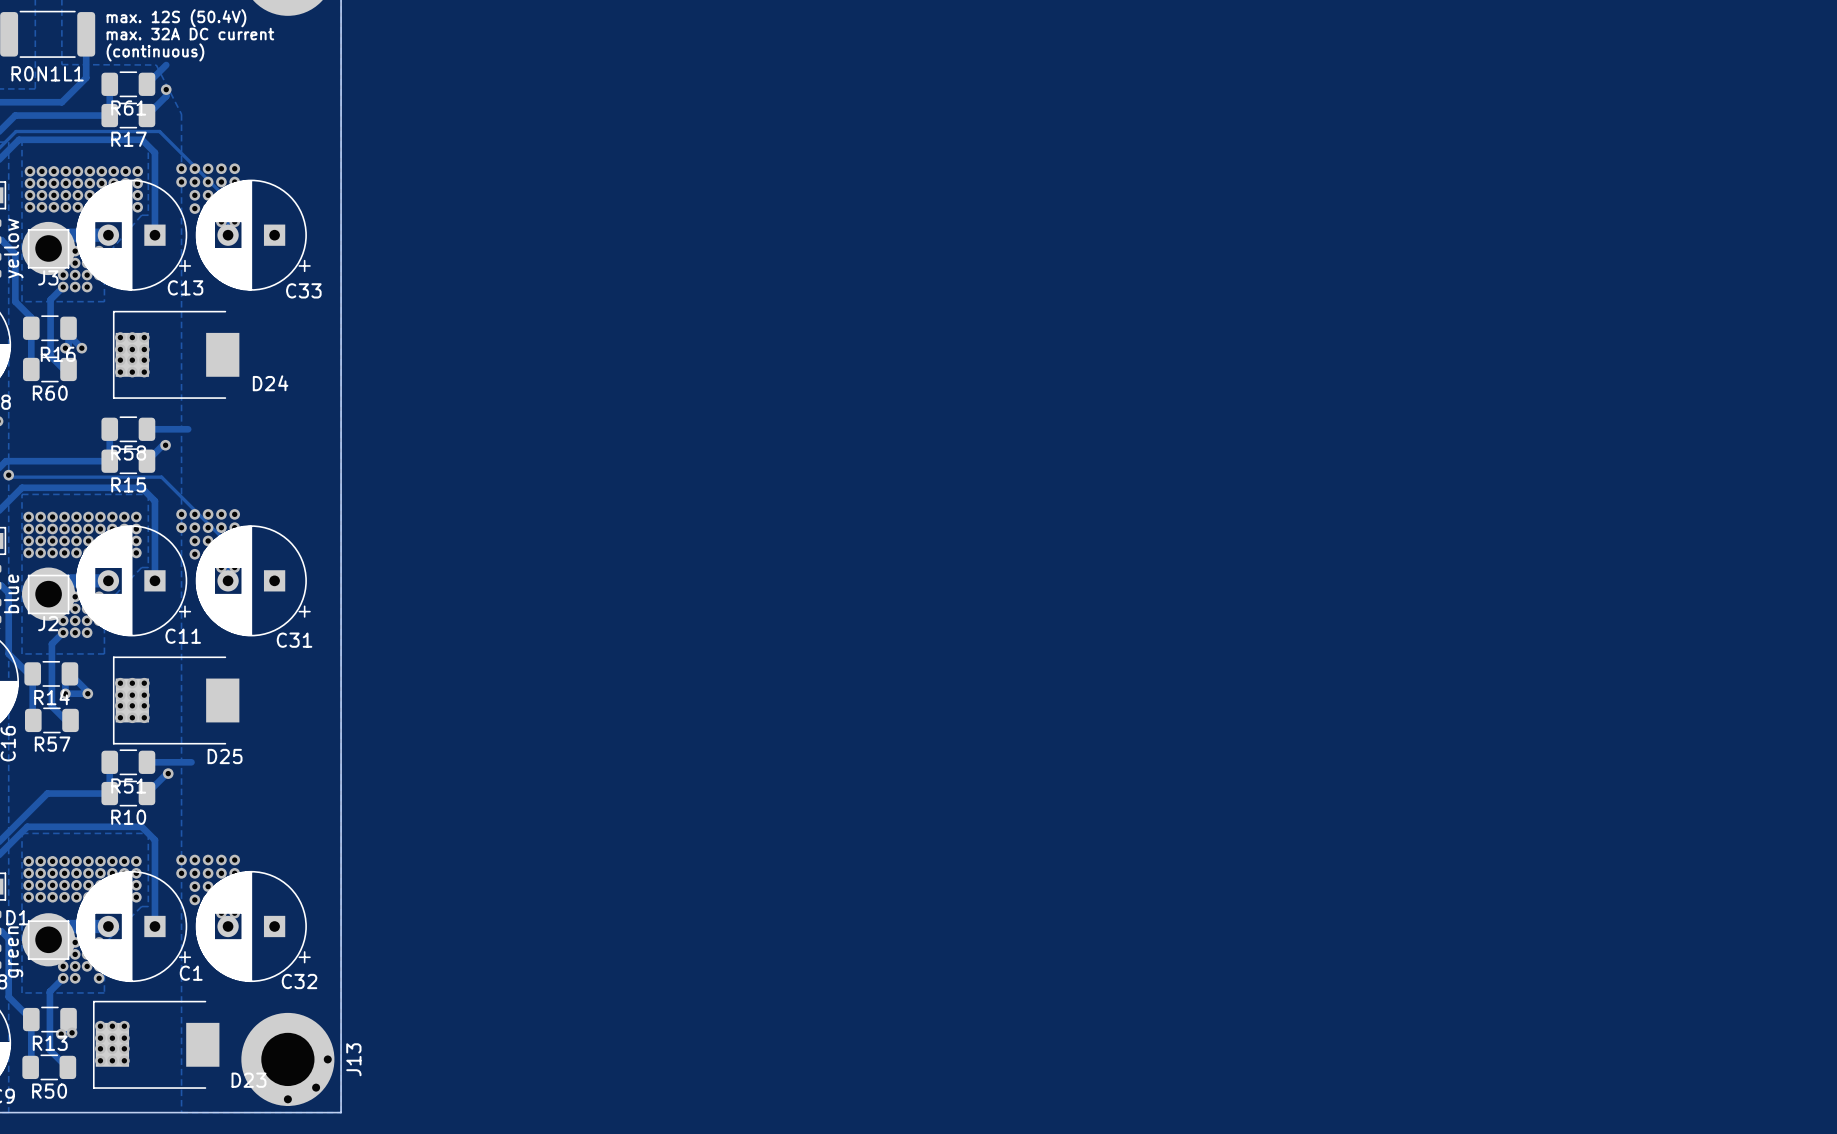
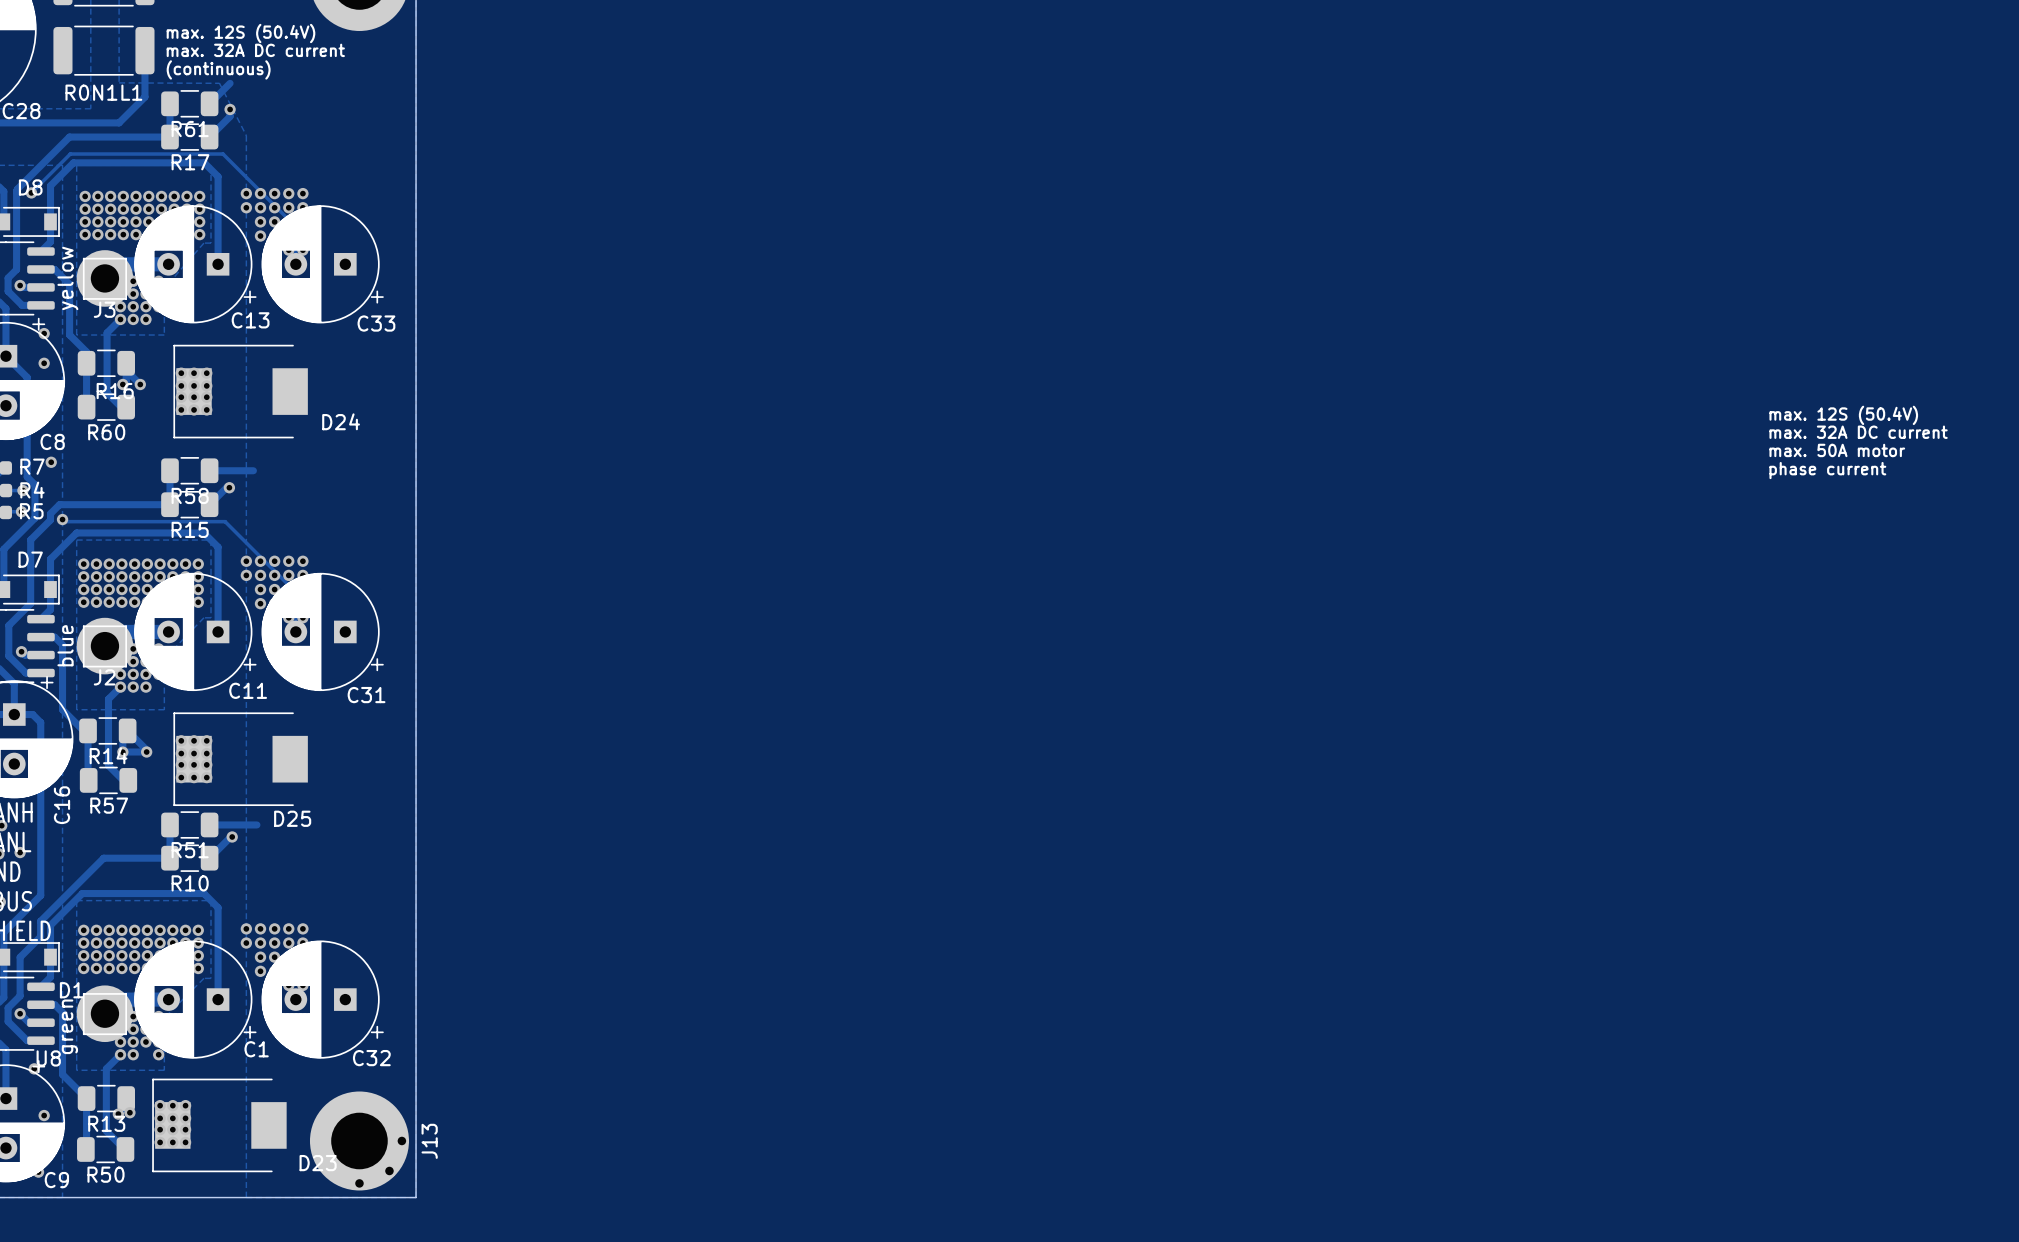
text: none -> max. 12S (50.4V) (1843, 415)
text: none -> max. 32A DC current (1858, 432)
text: none -> max. 50A motor (1837, 450)
text: none -> phase current (1827, 470)

